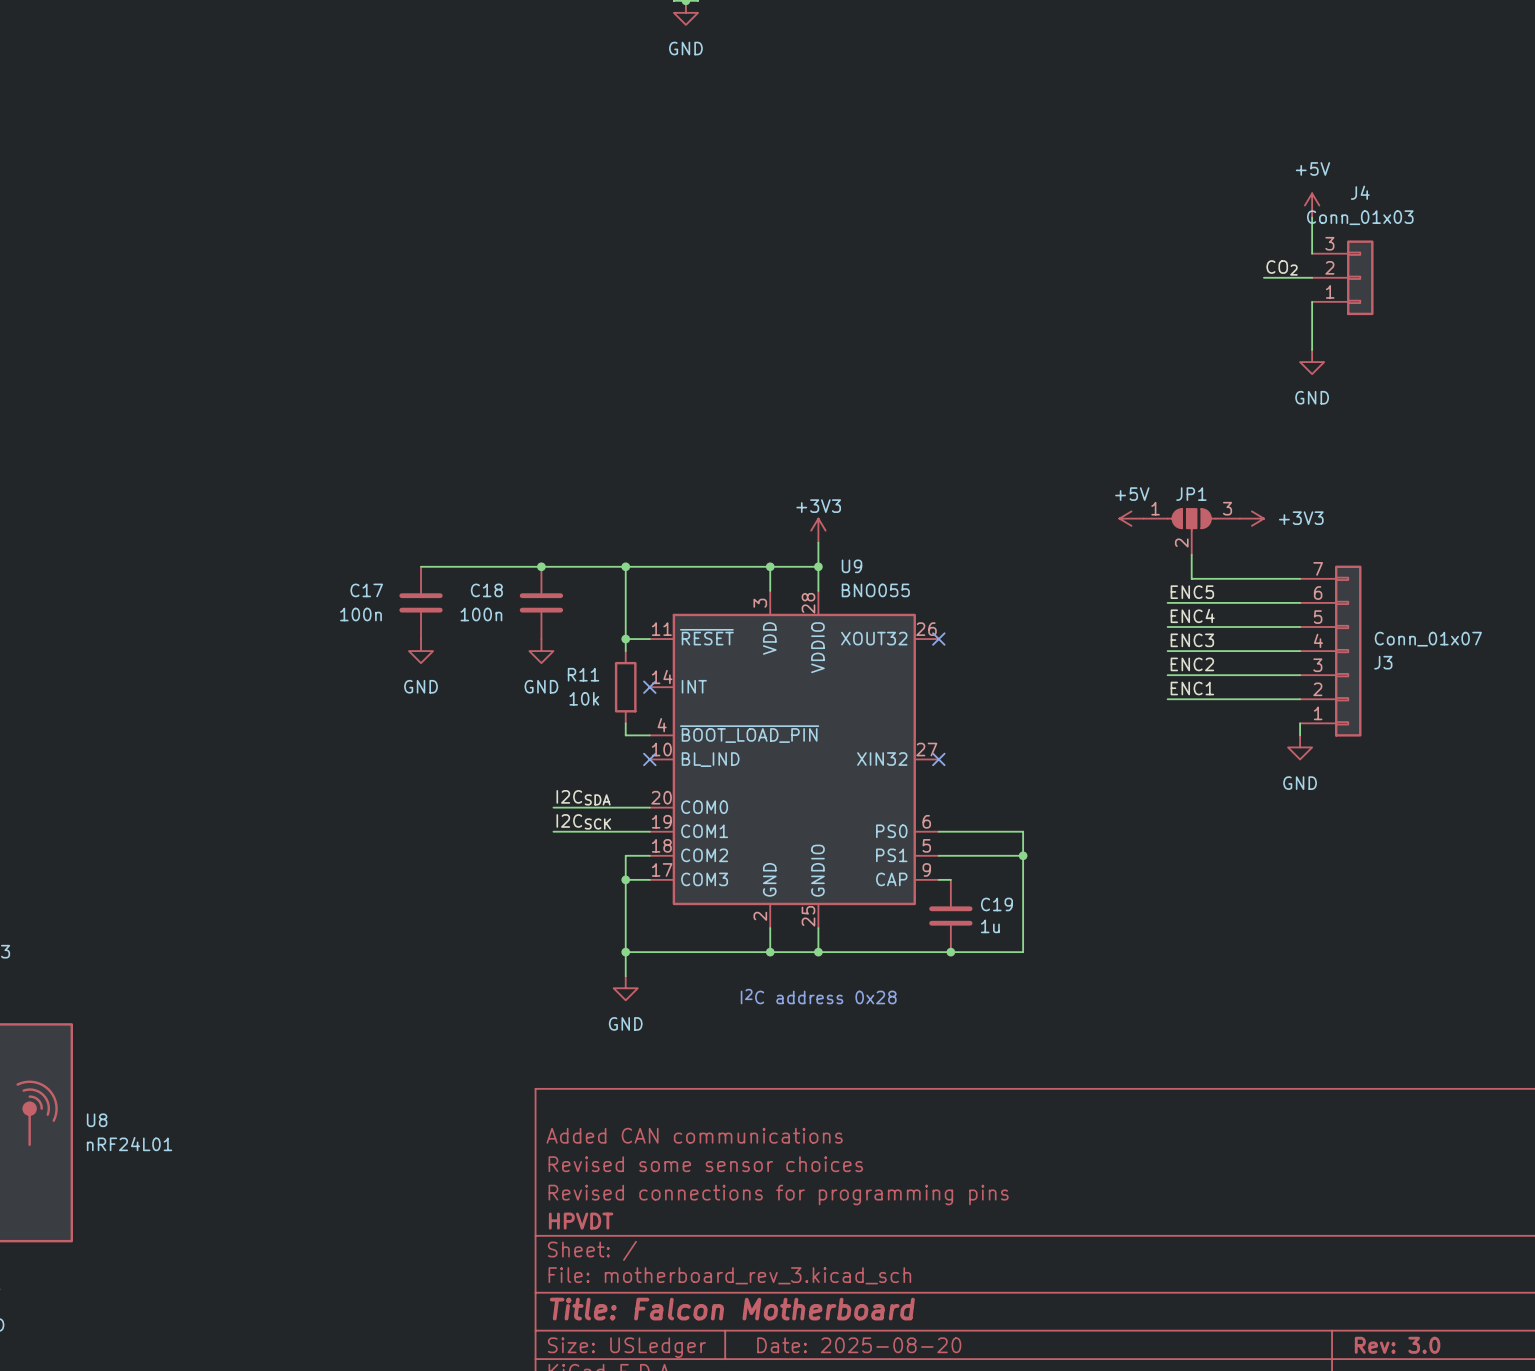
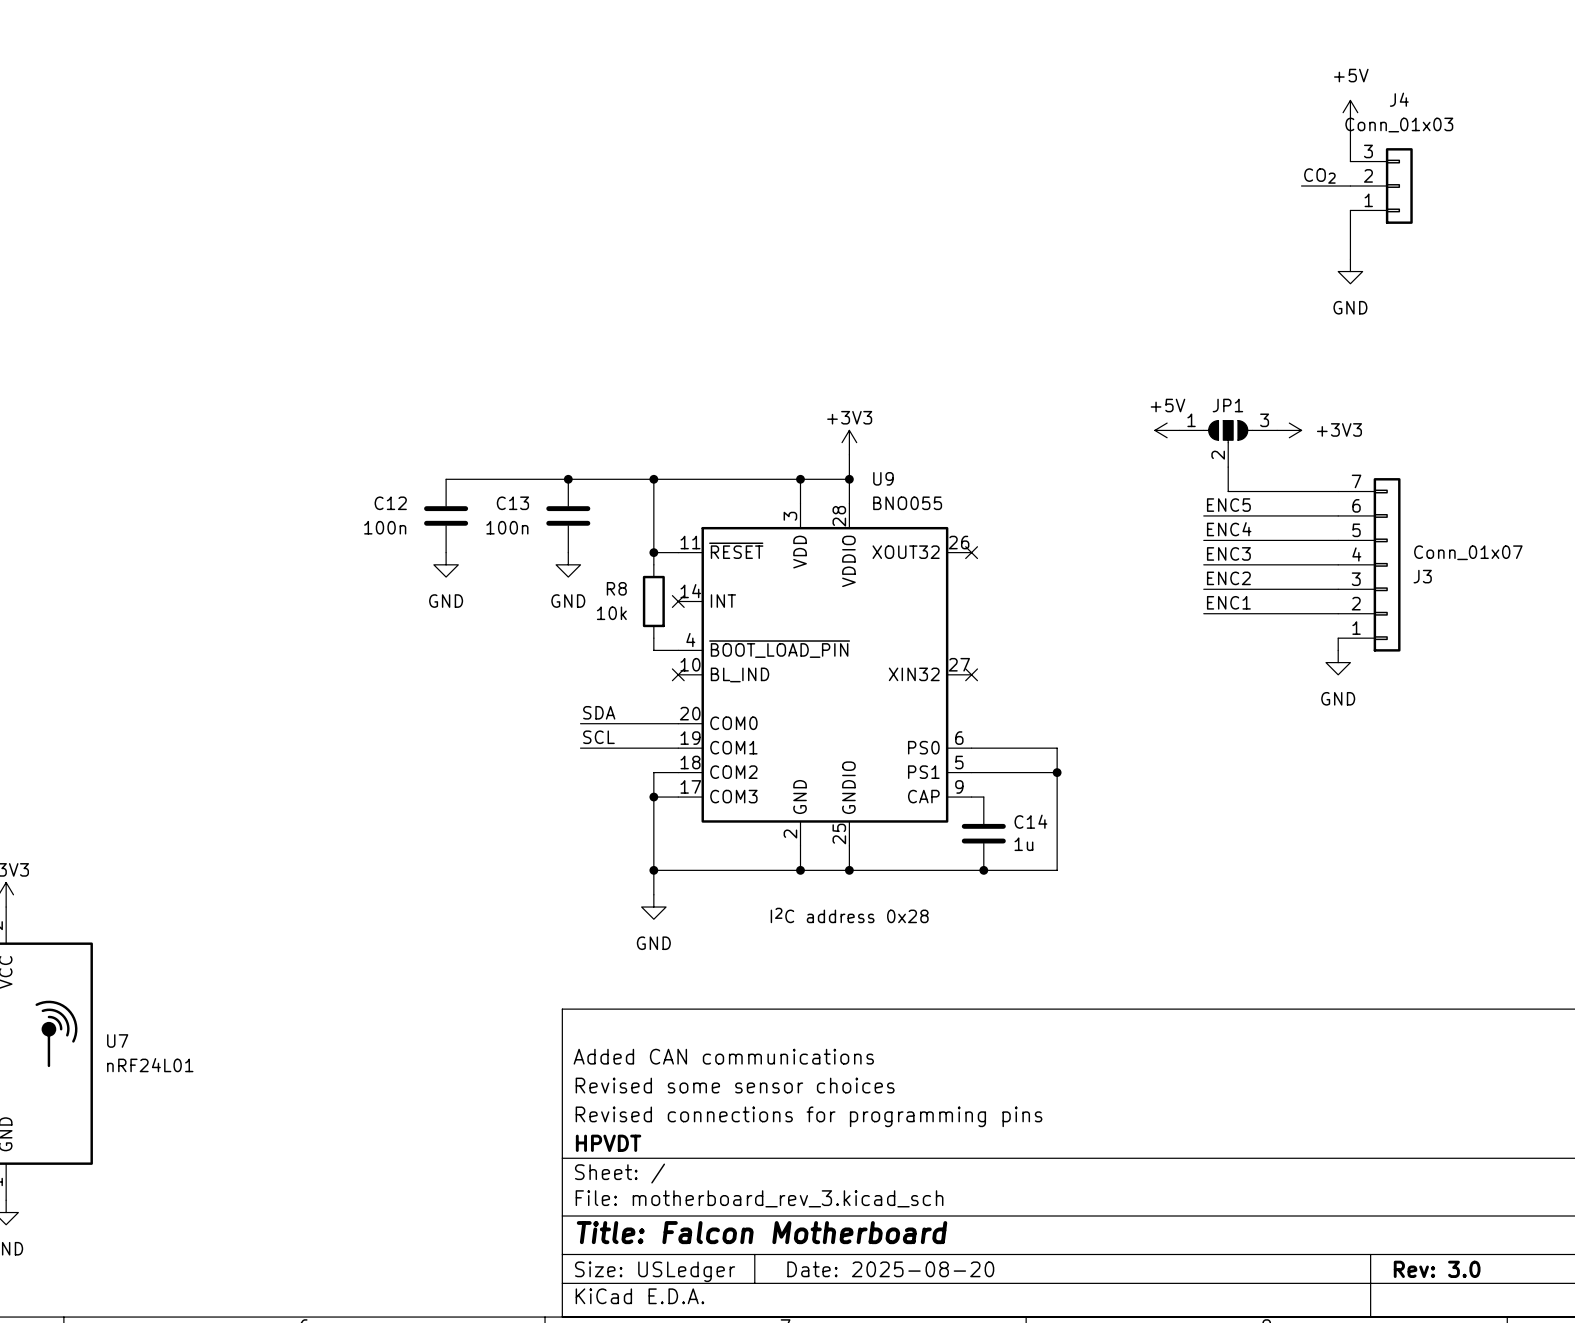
C17 name: C17 (366, 590) -> C12 (390, 503)
C18 name: C18 (486, 590) -> C13 (512, 503)
R11 name: R11 (583, 674) -> R8 (616, 588)
label: I2CSDA (583, 797) -> SDA (599, 712)
label: I2CSCK (583, 821) -> SCL (598, 737)
C19 name: C19 (997, 904) -> C14 (1030, 821)
U8 name: U8 (97, 1120) -> U7 (117, 1040)

